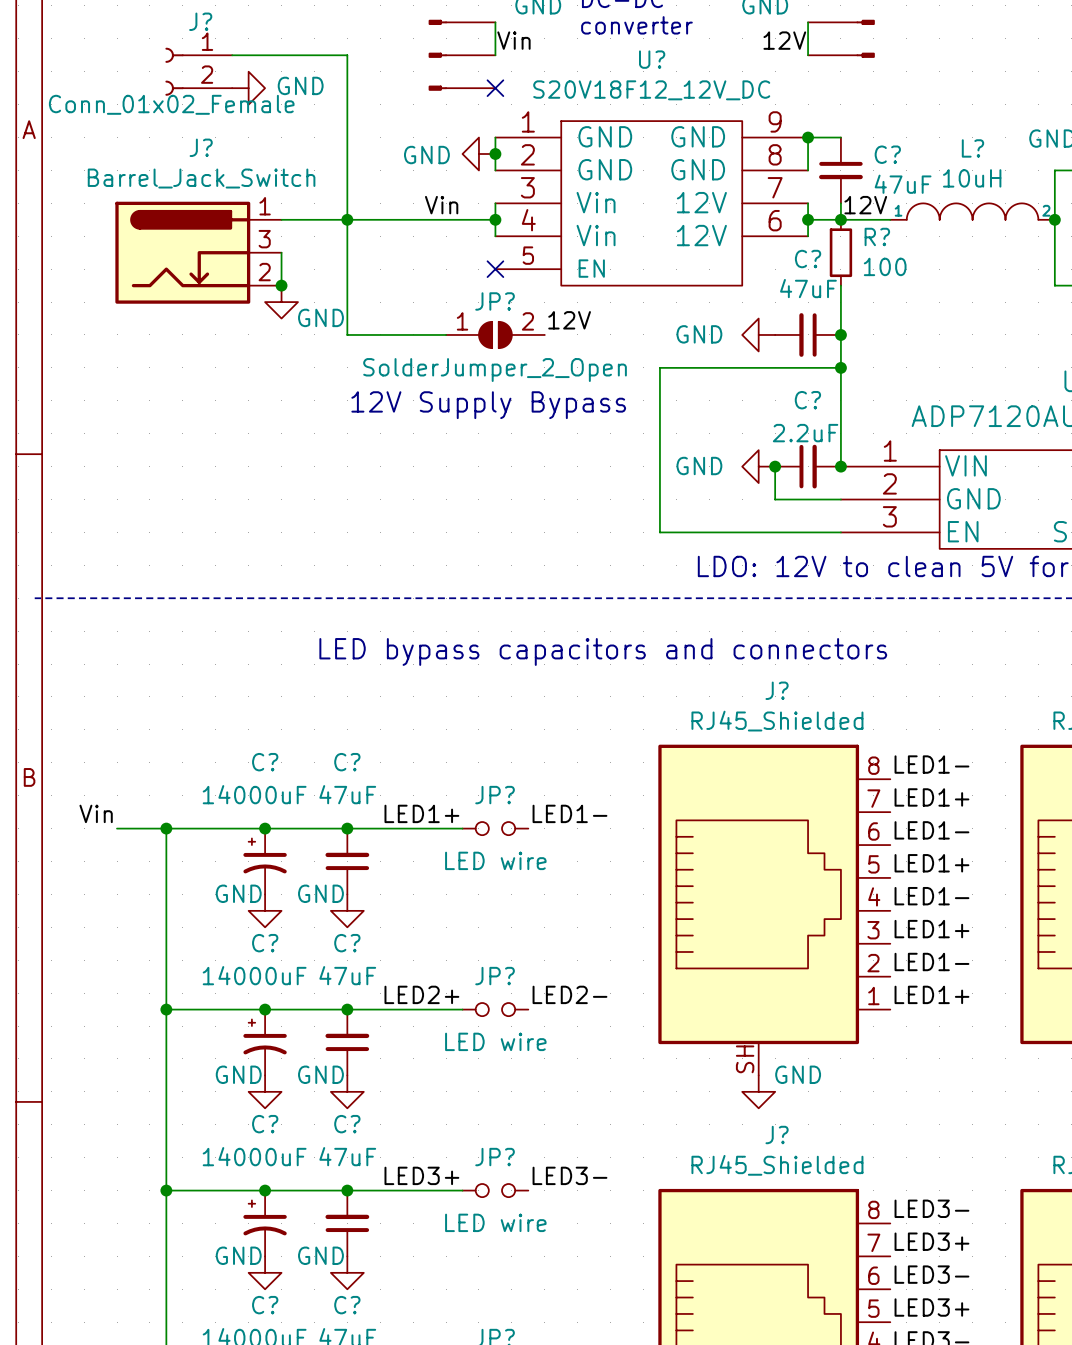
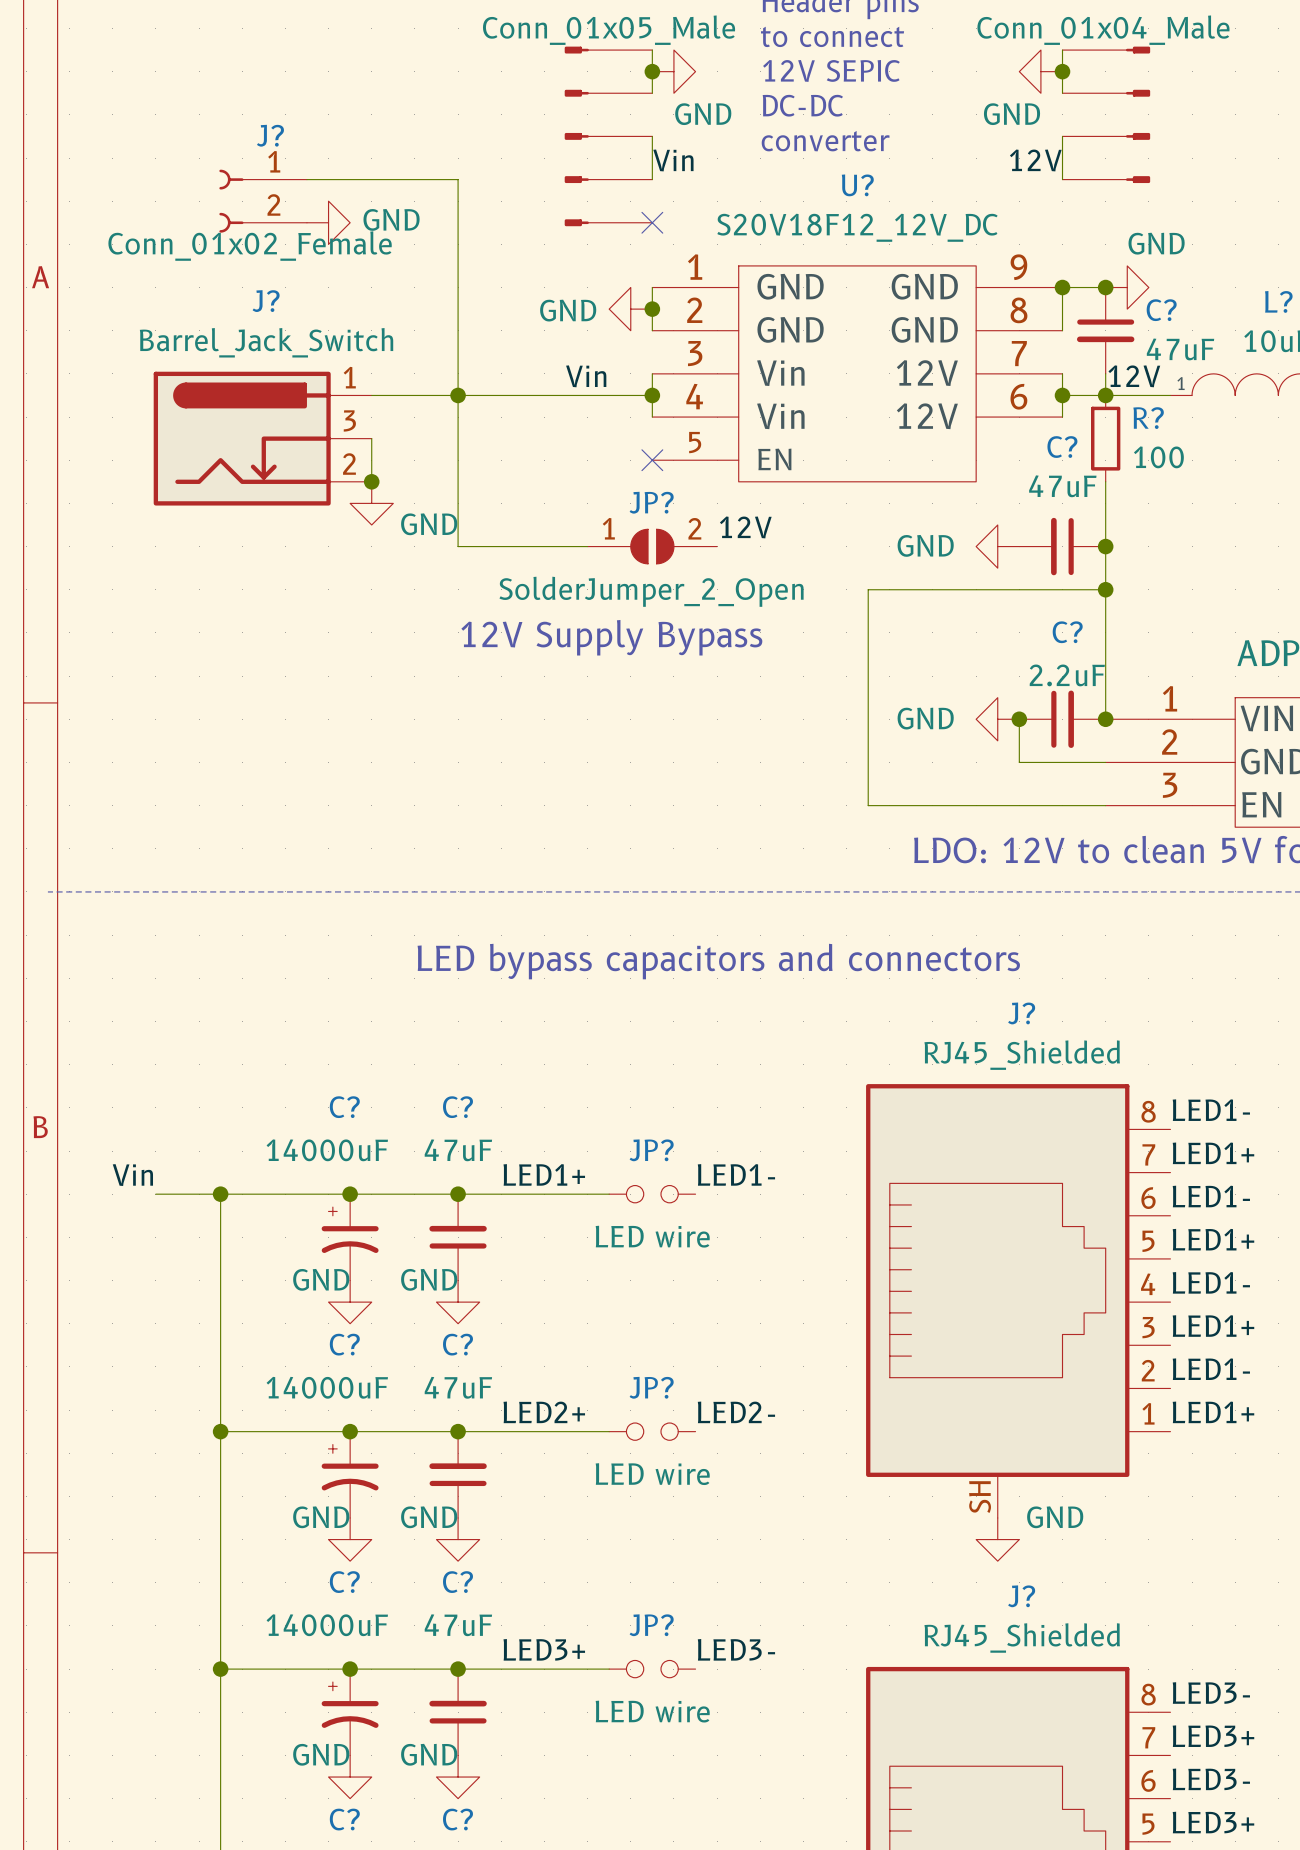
junction: none -> (1105, 287)
power symbol: none -> GND (1127, 287)

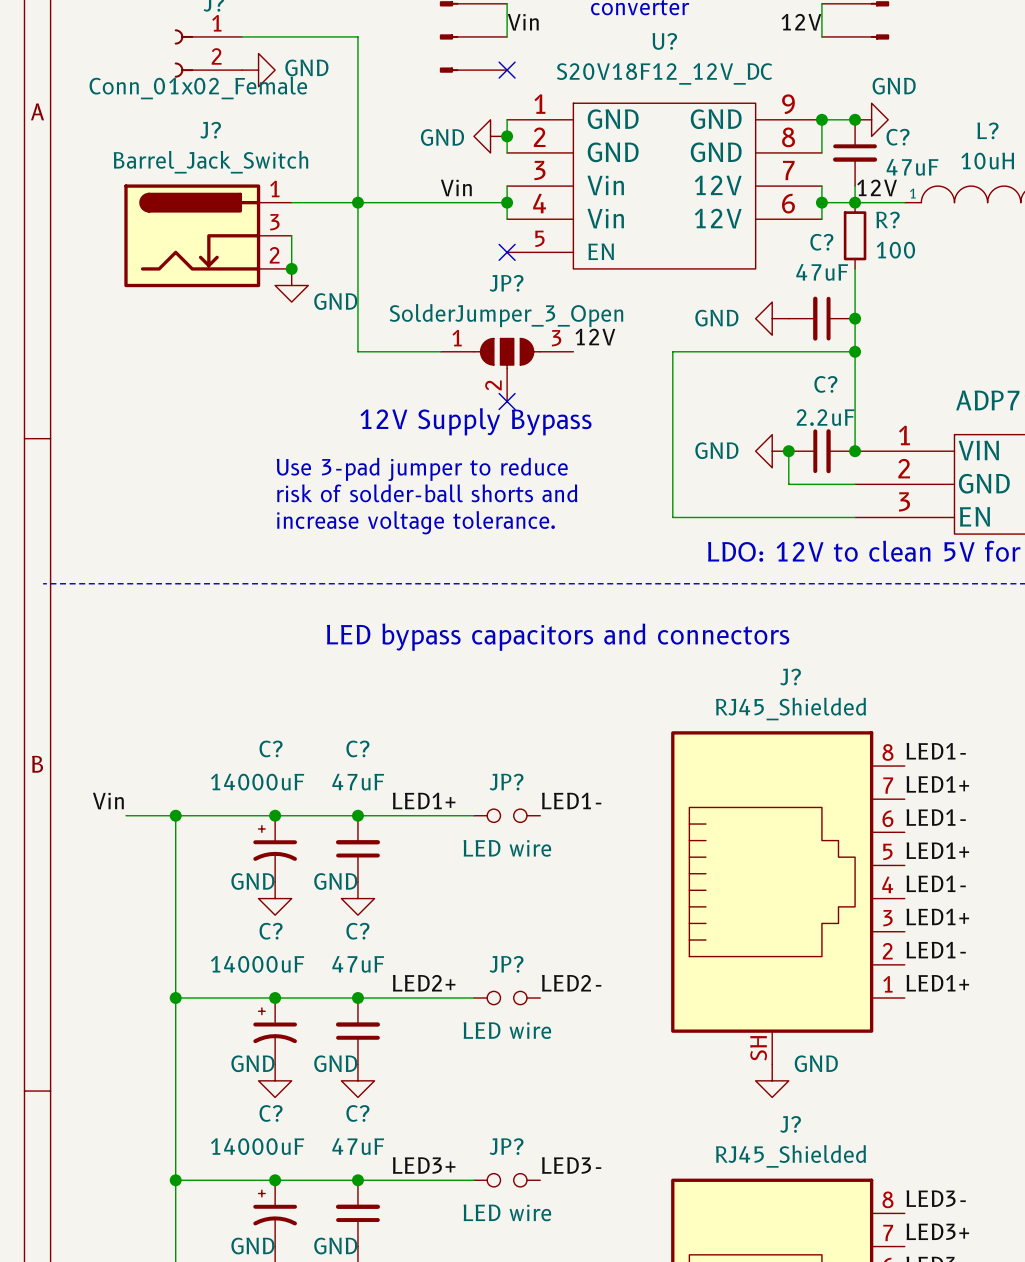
label position: 12V (745, 527) -> 12V (595, 337)
wire: (458, 546) (587, 546) -> (357, 318) (357, 351) (440, 351)
JP?: SolderJumper_2_Open (652, 546) -> none
JP?: none -> SolderJumper_3_Open (507, 370)
text position: 12V Supply Bypass (611, 637) -> 12V Supply Bypass (476, 421)
no-connect mark: none -> (507, 401)
text: none -> Use 3-pad jumper to reduce (422, 469)
text: none -> risk of solder-ball shorts and (427, 493)
text: none -> increase voltage tolerance. (416, 522)

